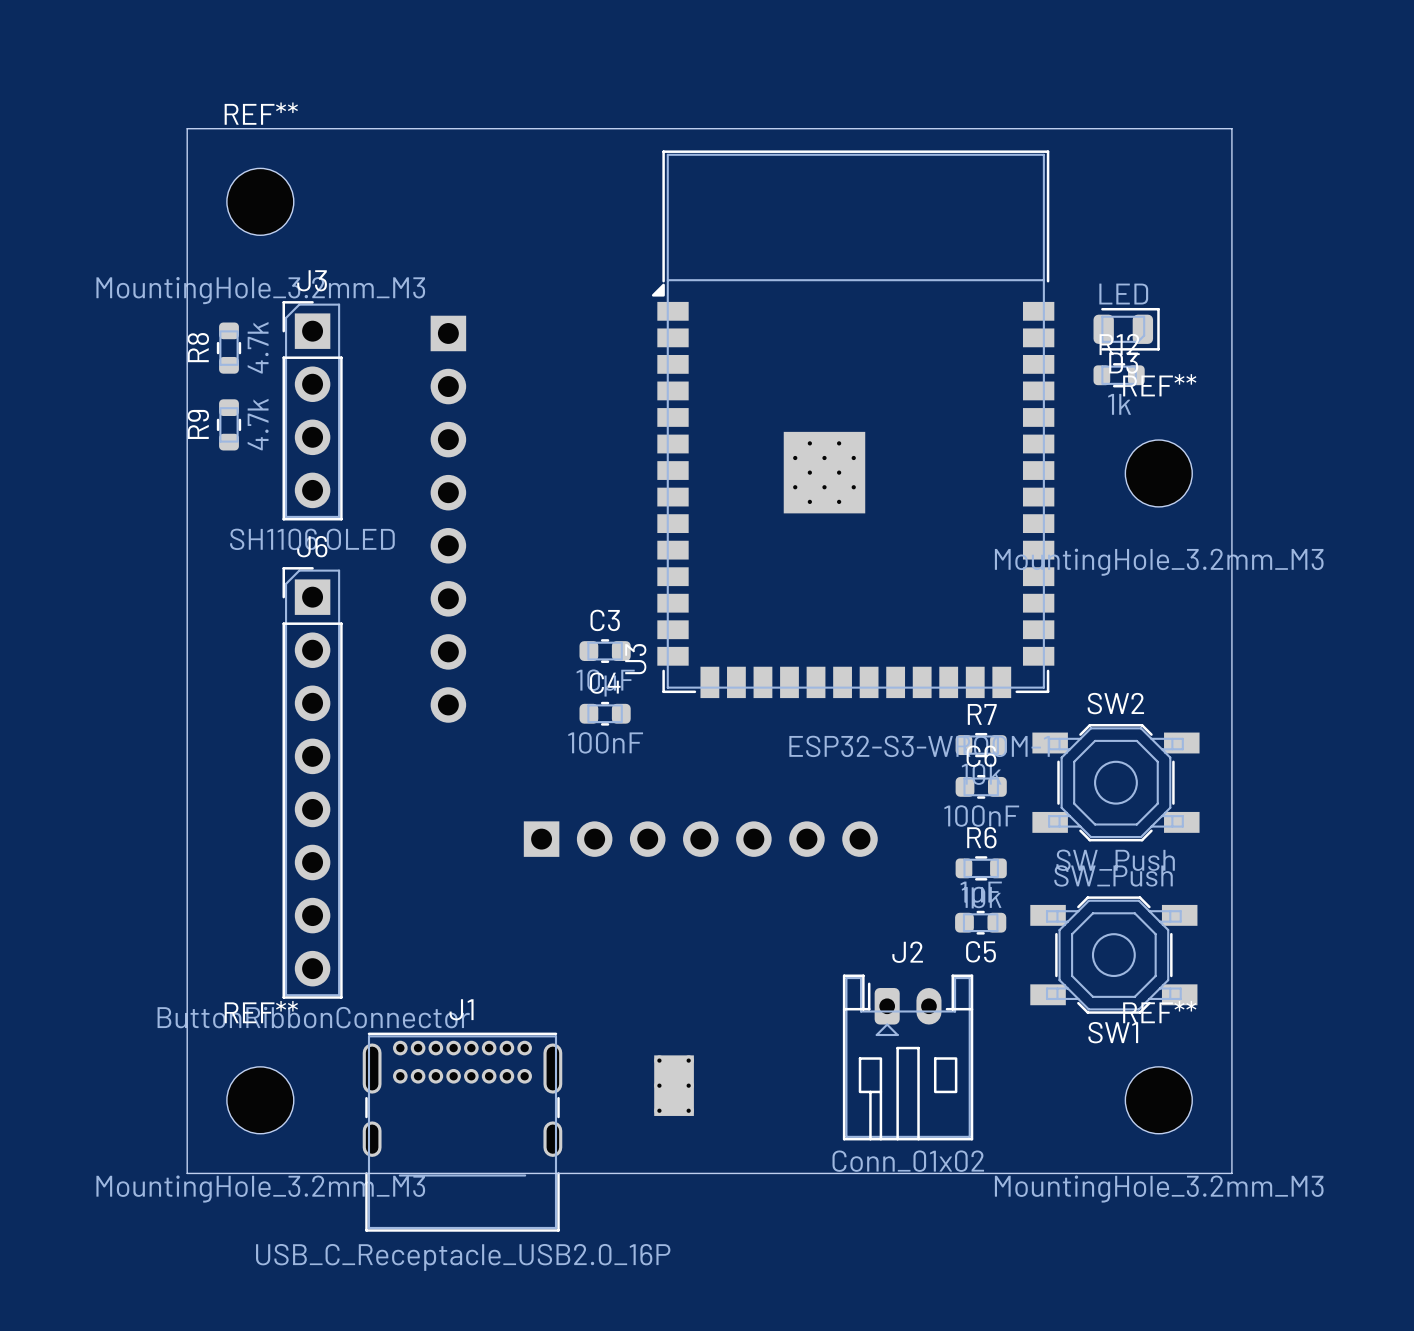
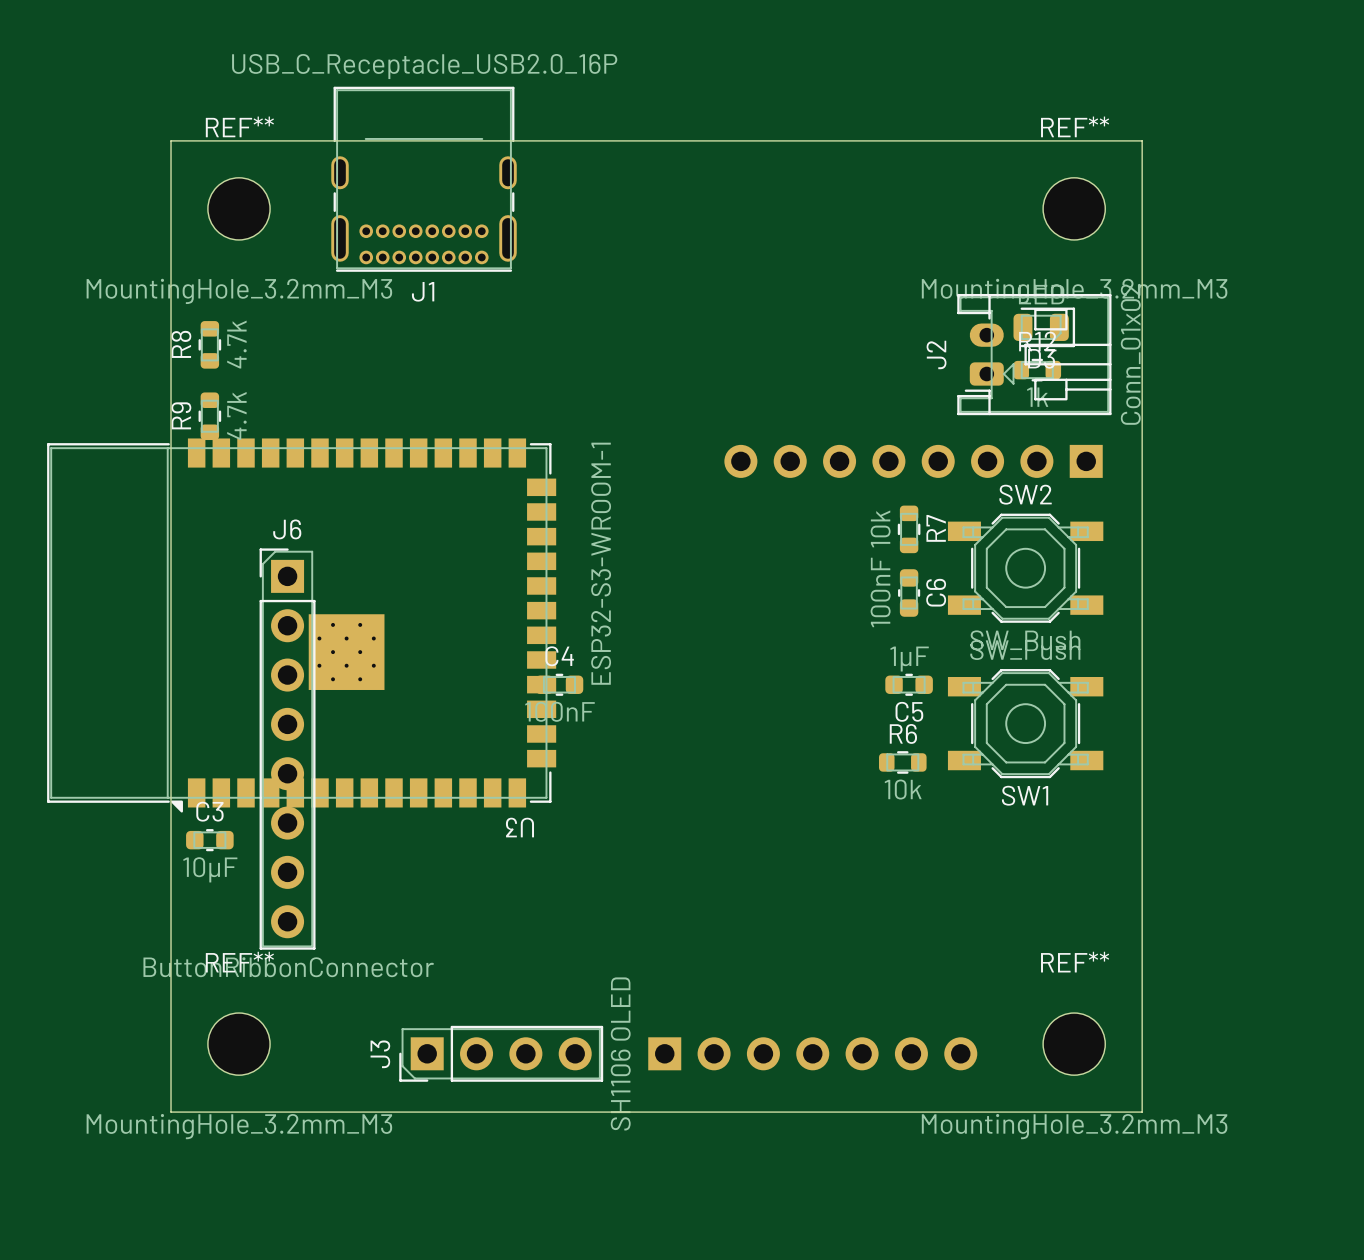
J3 rotation: 0° (312, 410) -> 90° counterclockwise (501, 1053)
J3 position: (312, 410) -> (501, 1053)
U3 rotation: 0° (853, 424) -> 90° counterclockwise (301, 625)
U3 position: (853, 424) -> (301, 625)
part: none -> (913, 461)
REF** position: (1158, 473) -> (1074, 208)
part: (448, 519) -> none
C3 position: (605, 651) -> (209, 840)
R7 rotation: 0° (981, 745) -> 90° clockwise (909, 529)
R7 position: (981, 745) -> (909, 529)
SW2 position: (1115, 782) -> (1025, 568)
C6 rotation: 0° (981, 786) -> 90° clockwise (909, 592)
C6 position: (981, 786) -> (909, 592)
part position: (700, 839) -> (812, 1053)
R6 position: (981, 868) -> (902, 762)
C5 position: (980, 922) -> (909, 684)
SW1 position: (1113, 955) -> (1025, 723)
J2 rotation: 0° (908, 1057) -> 90° counterclockwise (1034, 354)
J2 position: (908, 1057) -> (1034, 354)
part: (674, 1085) -> none
J1 rotation: 0° (462, 1132) -> 180° (424, 179)
J1 position: (462, 1132) -> (424, 179)

